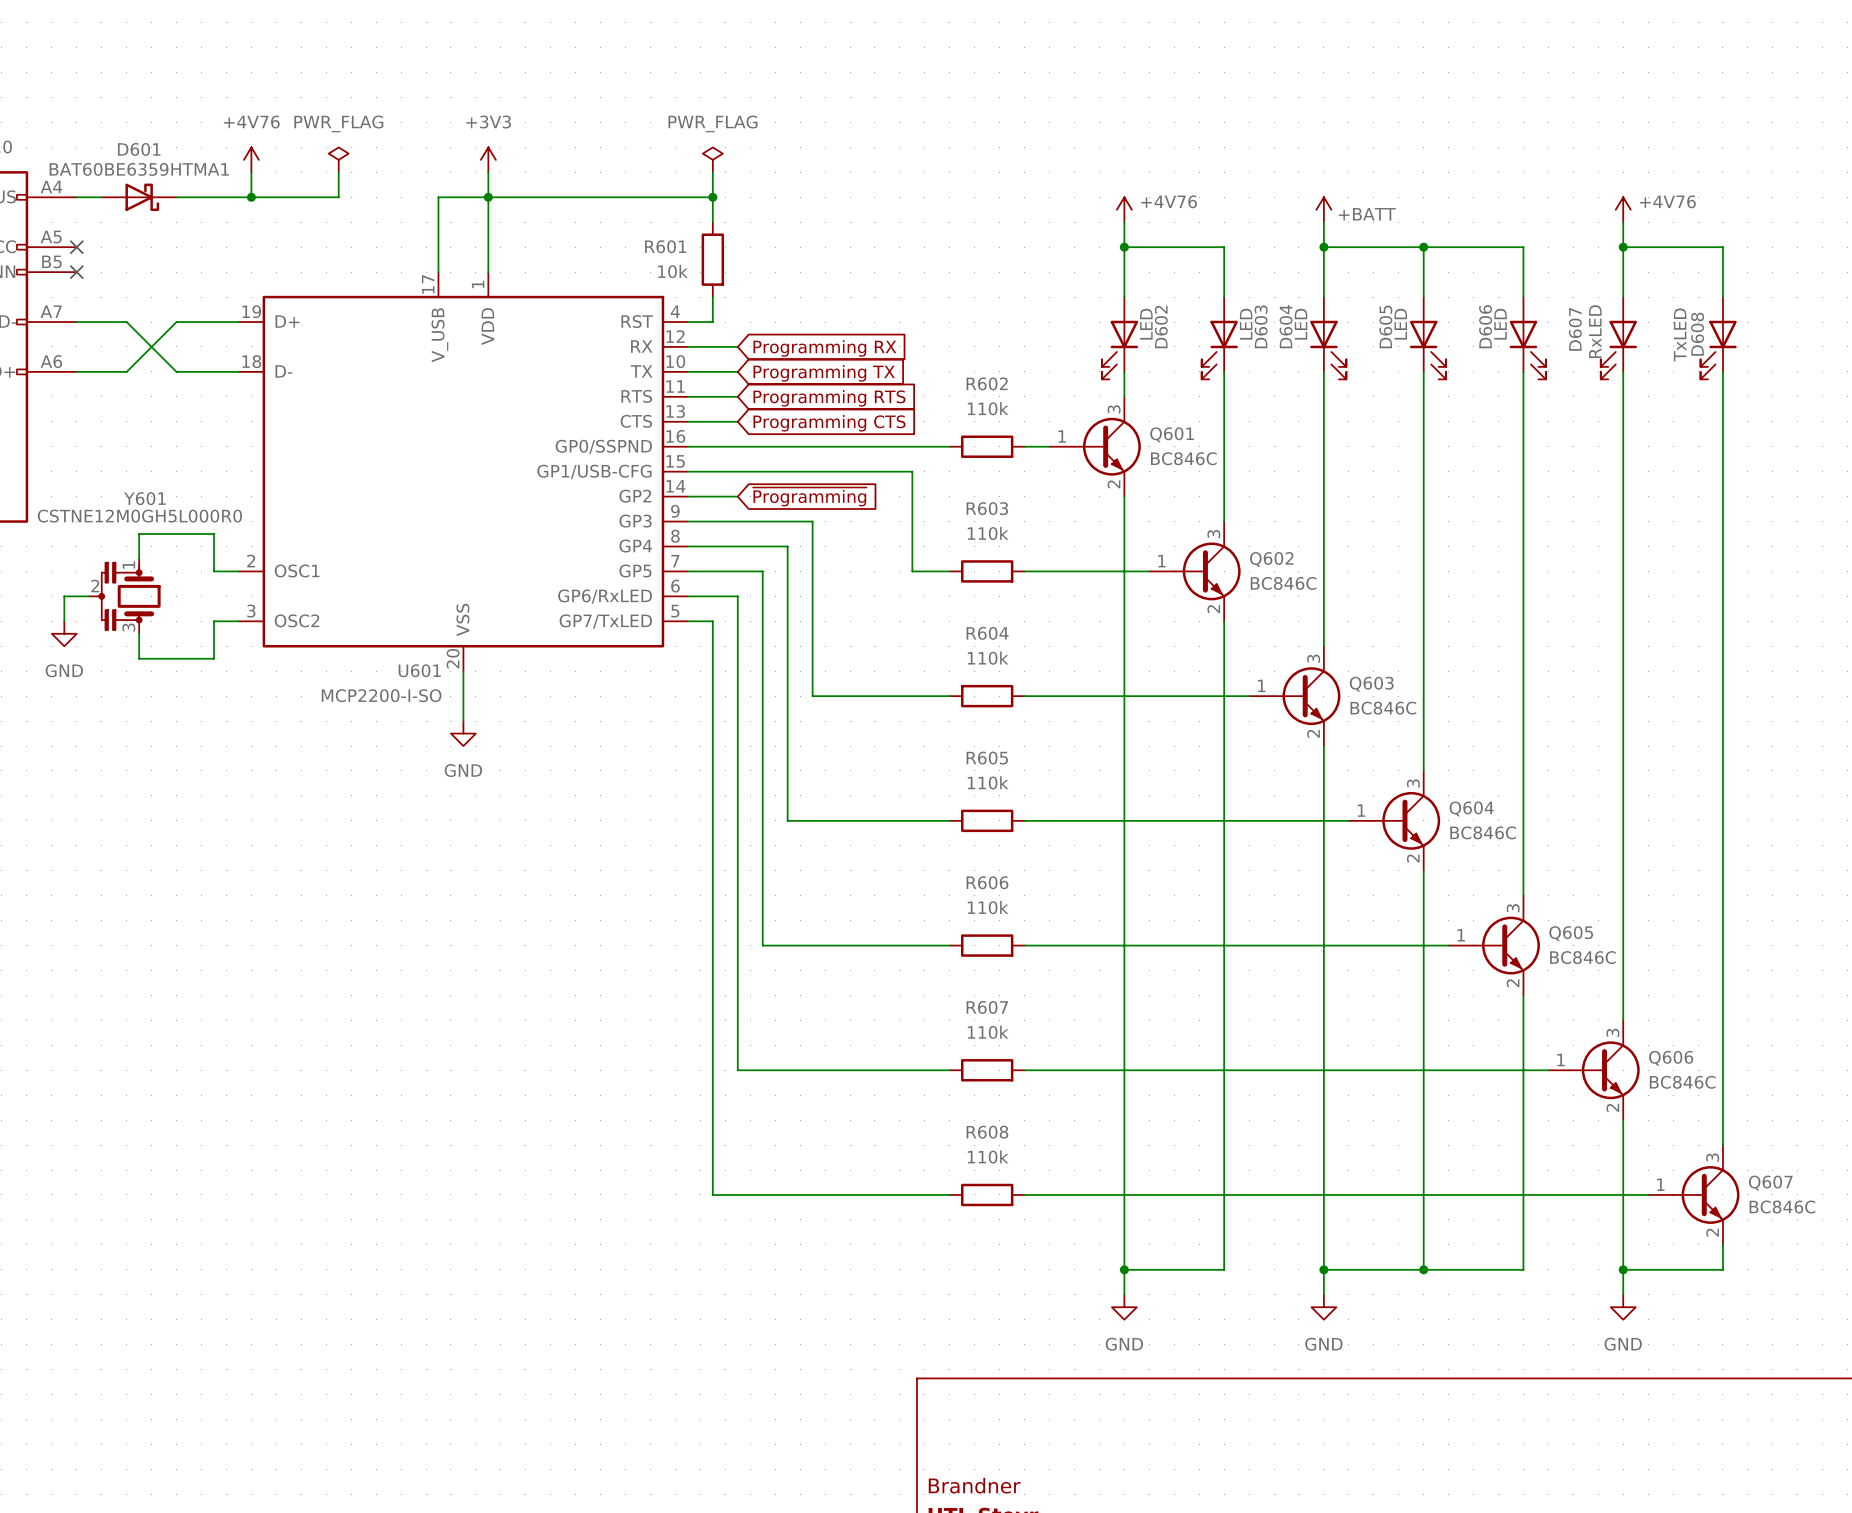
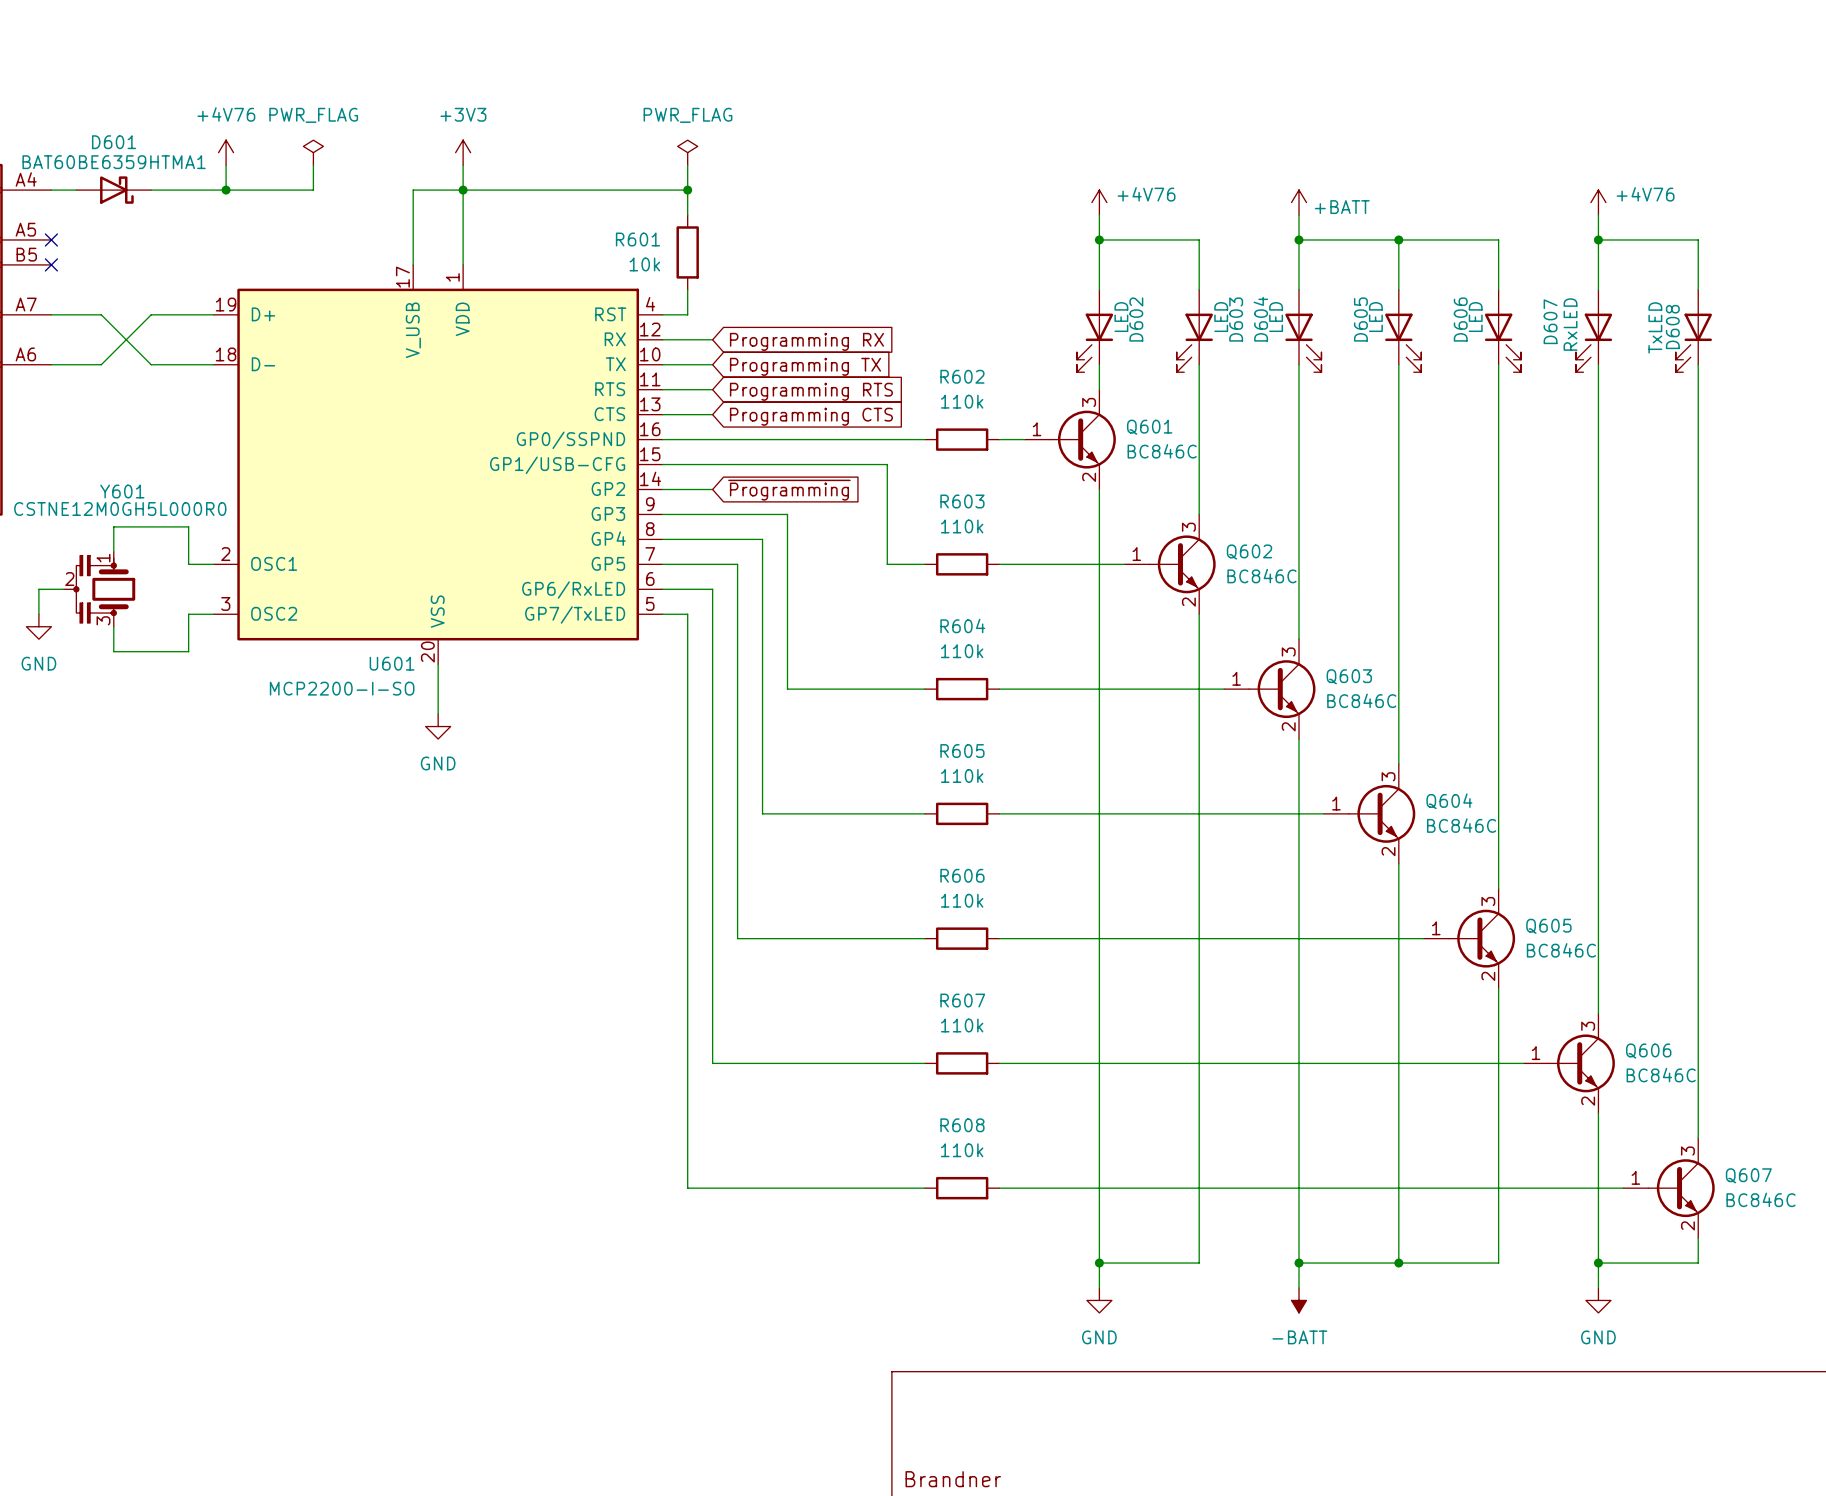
power symbol: GND (1323, 1307) -> -BATT (1299, 1300)

